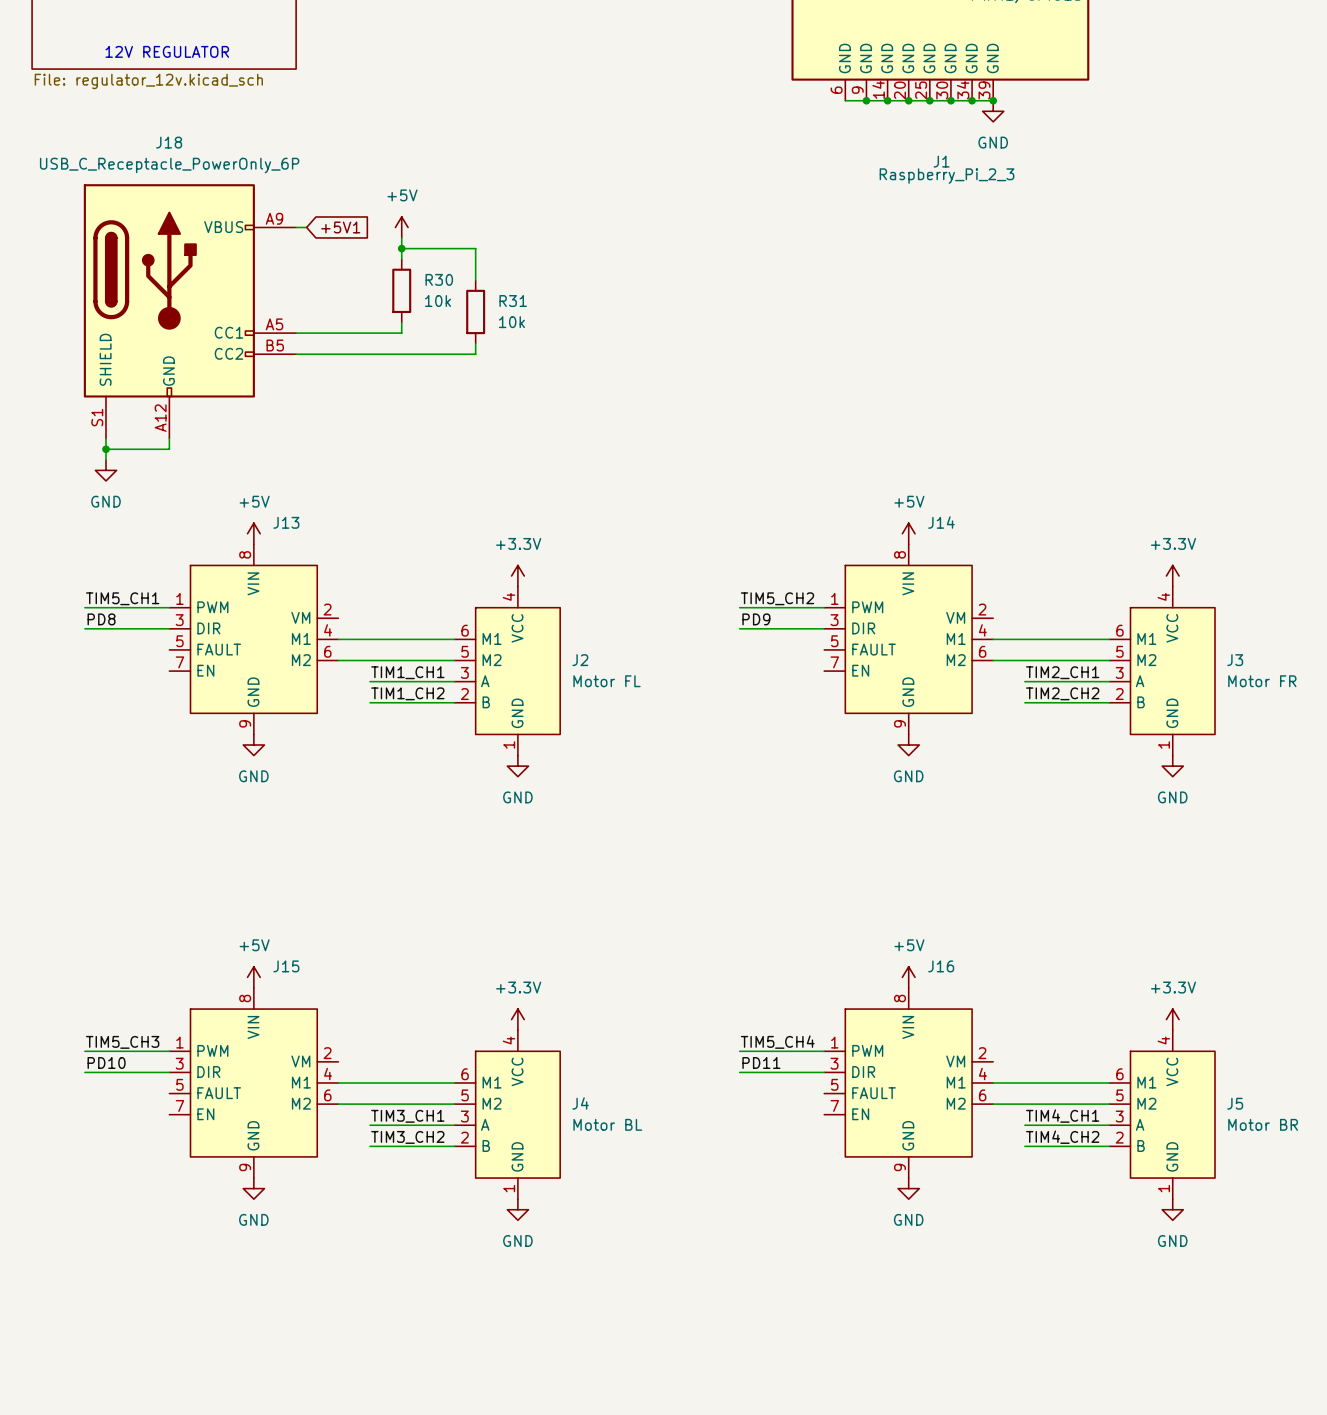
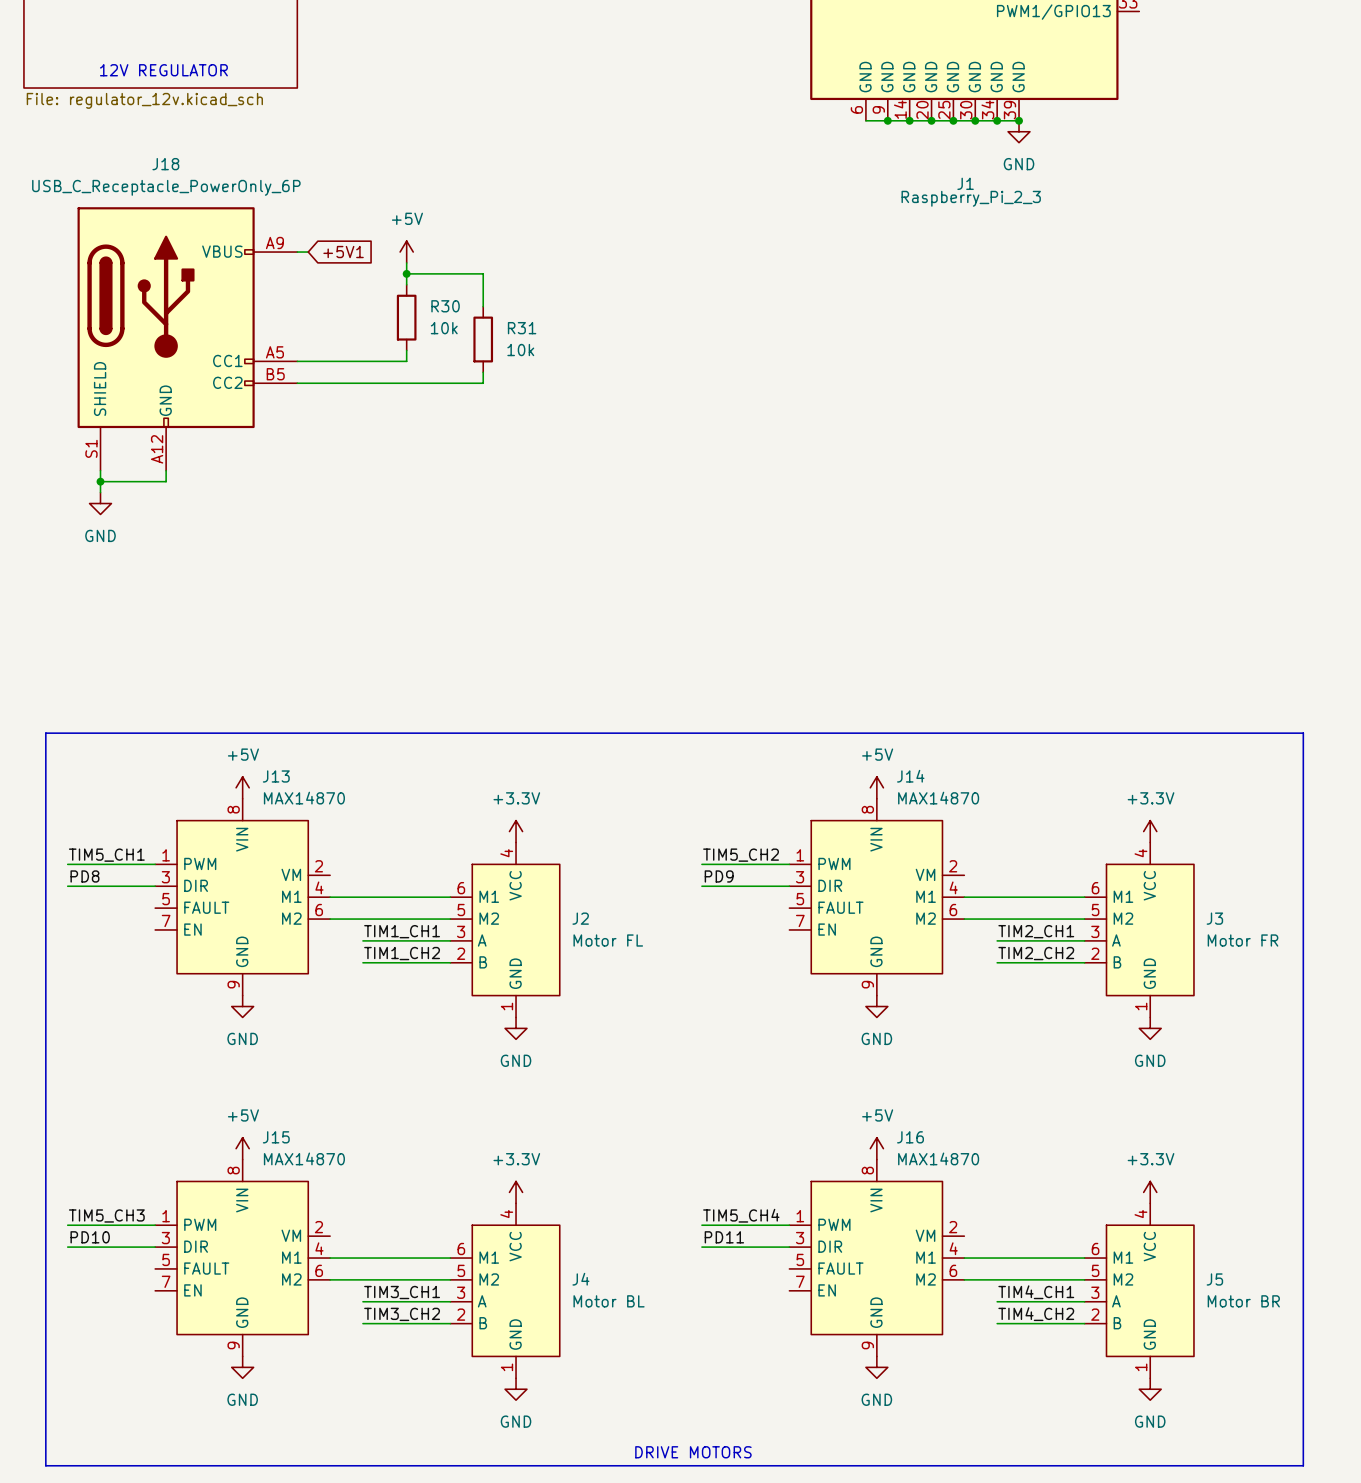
power symbol: +5V (253, 533) -> none
power symbol: +5V (908, 533) -> none
power symbol: +3.3V (517, 576) -> none
power symbol: +3.3V (1172, 576) -> none
label: TIM5_CH1 (122, 598) -> none
label: TIM5_CH2 (777, 598) -> none
wire: (84, 607) (169, 607) -> none
wire: (739, 607) (824, 607) -> none
label: PD8 (101, 619) -> none
label: PD9 (756, 619) -> none
wire: (84, 628) (169, 628) -> (67, 864) (155, 864)
wire: (739, 628) (824, 628) -> (701, 864) (789, 864)
J13 position: (253, 639) -> (242, 897)
wire: (338, 639) (454, 639) -> none
J14 position: (908, 639) -> (876, 897)
wire: (993, 639) (1109, 639) -> none
wire: (338, 660) (454, 660) -> (330, 897) (450, 897)
wire: (993, 660) (1109, 660) -> (964, 897) (1084, 897)
J2 position: (507, 671) -> (505, 929)
J3 position: (1162, 671) -> (1139, 929)
label: TIM1_CH1 (407, 672) -> none
label: TIM2_CH1 (1062, 672) -> none
wire: (370, 681) (454, 681) -> none
wire: (1024, 681) (1109, 681) -> none
line: none -> (45, 733) (1303, 733) (1303, 1465) (45, 1465) (45, 733)
label: TIM1_CH2 (407, 693) -> none
label: TIM2_CH2 (1062, 693) -> none
wire: (370, 702) (454, 702) -> (362, 940) (450, 940)
wire: (1024, 702) (1109, 702) -> (997, 940) (1084, 940)
power symbol: none -> +5V (242, 787)
power symbol: GND (253, 745) -> none
power symbol: none -> +5V (876, 787)
power symbol: GND (908, 745) -> none
J13 value: none -> MAX14870 (304, 798)
J14 value: none -> MAX14870 (938, 798)
power symbol: GND (517, 766) -> none
power symbol: GND (1172, 766) -> none
power symbol: none -> +3.3V (516, 831)
power symbol: none -> +3.3V (1150, 831)
label: none -> TIM5_CH1 (106, 855)
label: none -> TIM5_CH2 (741, 855)
label: none -> PD8 (84, 876)
label: none -> PD9 (719, 876)
wire: none -> (67, 886) (155, 886)
wire: none -> (701, 886) (789, 886)
wire: none -> (330, 919) (450, 919)
wire: none -> (964, 919) (1084, 919)
label: none -> TIM1_CH1 (402, 931)
label: none -> TIM2_CH1 (1036, 931)
label: none -> TIM1_CH2 (402, 953)
label: none -> TIM2_CH2 (1036, 953)
wire: none -> (362, 962) (450, 962)
wire: none -> (997, 962) (1084, 962)
power symbol: none -> GND (242, 1006)
power symbol: none -> GND (876, 1006)
power symbol: +5V (253, 977) -> none
power symbol: none -> GND (516, 1028)
power symbol: +5V (908, 977) -> none
power symbol: none -> GND (1150, 1028)
power symbol: +3.3V (517, 1019) -> none
power symbol: +3.3V (1172, 1019) -> none
label position: TIM5_CH3 (122, 1042) -> TIM5_CH3 (106, 1215)
label position: TIM5_CH4 (777, 1042) -> TIM5_CH4 (741, 1215)
wire: (84, 1051) (169, 1051) -> (67, 1225) (155, 1225)
wire: (739, 1051) (824, 1051) -> (701, 1225) (789, 1225)
label position: PD10 (106, 1063) -> PD10 (90, 1237)
label position: PD11 (761, 1063) -> PD11 (724, 1237)
wire: (84, 1072) (169, 1072) -> (67, 1247) (155, 1247)
wire: (739, 1072) (824, 1072) -> (701, 1247) (789, 1247)
J15 position: (253, 1082) -> (242, 1258)
wire: (338, 1082) (454, 1082) -> (330, 1258) (450, 1258)
J16 position: (908, 1082) -> (876, 1258)
wire: (993, 1082) (1109, 1082) -> (964, 1258) (1084, 1258)
power symbol: none -> +5V (242, 1148)
power symbol: none -> +5V (876, 1148)
J15 value: none -> MAX14870 (304, 1158)
J16 value: none -> MAX14870 (938, 1158)
wire: (338, 1104) (454, 1104) -> (330, 1279) (450, 1279)
wire: (993, 1104) (1109, 1104) -> (964, 1279) (1084, 1279)
J4 position: (507, 1114) -> (505, 1290)
J5 position: (1162, 1114) -> (1139, 1290)
label position: TIM3_CH1 (407, 1116) -> TIM3_CH1 (402, 1292)
label position: TIM4_CH1 (1062, 1116) -> TIM4_CH1 (1036, 1292)
wire: (370, 1125) (454, 1125) -> (362, 1301) (450, 1301)
wire: (1024, 1125) (1109, 1125) -> (997, 1301) (1084, 1301)
power symbol: none -> +3.3V (516, 1192)
power symbol: none -> +3.3V (1150, 1192)
label position: TIM3_CH2 (407, 1137) -> TIM3_CH2 (402, 1314)
label position: TIM4_CH2 (1062, 1137) -> TIM4_CH2 (1036, 1314)
wire: (370, 1146) (454, 1146) -> (362, 1323) (450, 1323)
wire: (1024, 1146) (1109, 1146) -> (997, 1323) (1084, 1323)
power symbol: GND (253, 1188) -> none
power symbol: GND (908, 1188) -> none
power symbol: GND (517, 1209) -> none
power symbol: GND (1172, 1209) -> none
power symbol: none -> GND (242, 1367)
power symbol: none -> GND (876, 1367)
power symbol: none -> GND (516, 1389)
power symbol: none -> GND (1150, 1389)
text: none -> DRIVE MOTORS (693, 1452)

